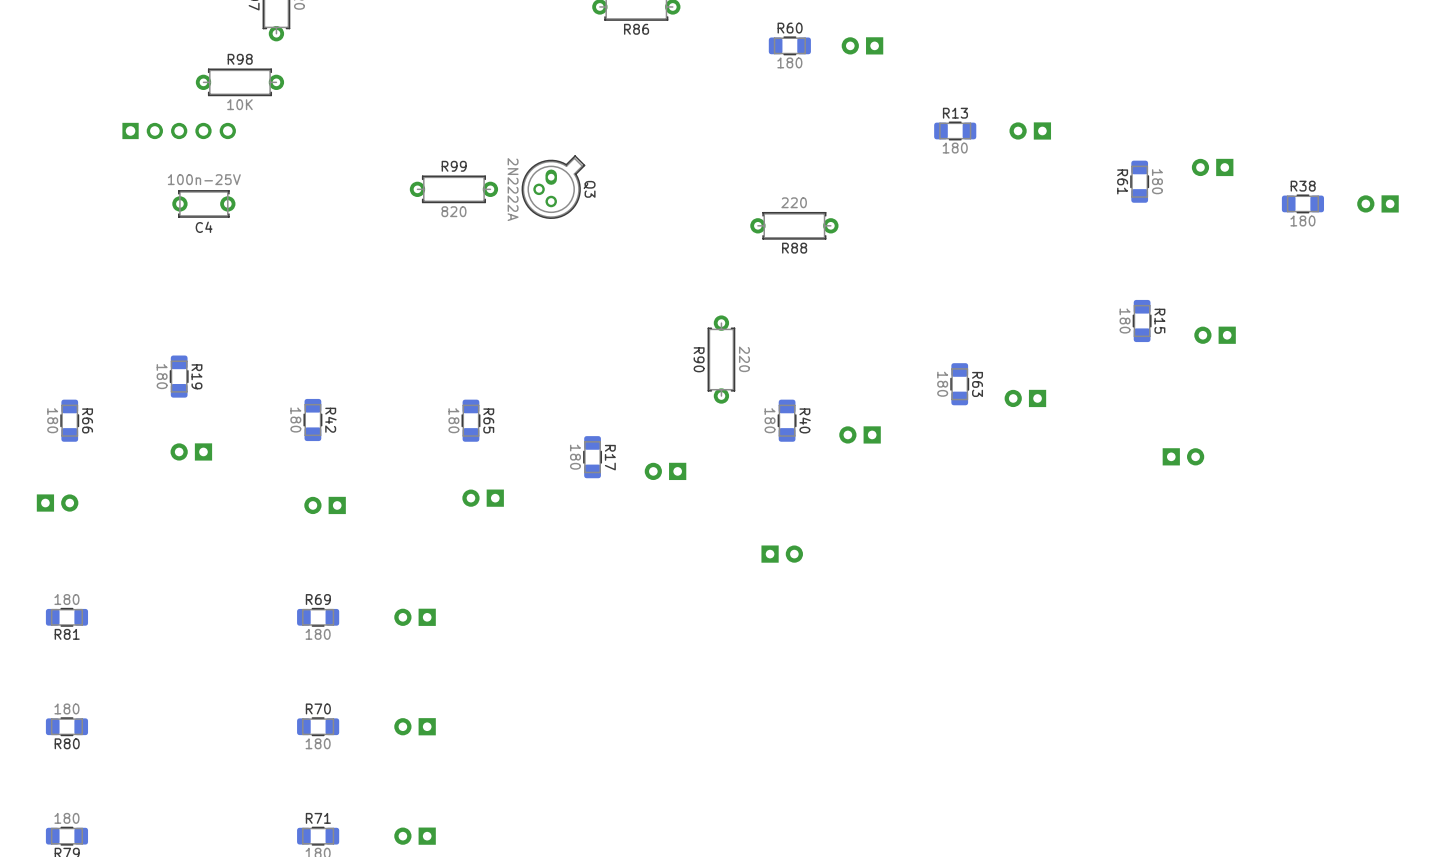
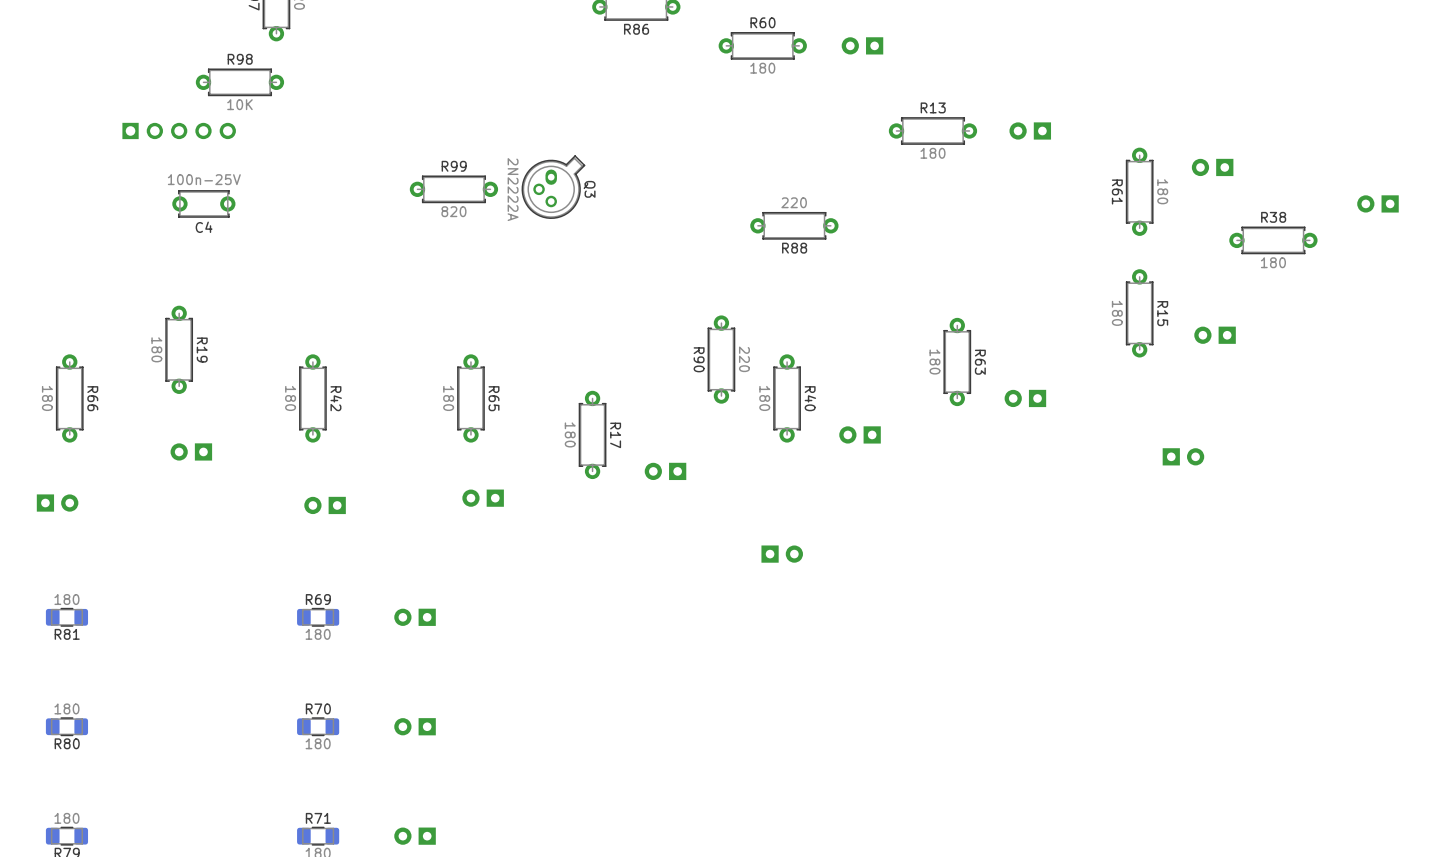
R60 footprint: [768, 36, 811, 56] -> [718, 32, 807, 60]
R13 footprint: [934, 121, 977, 141] -> [888, 117, 978, 145]
R61 footprint: [1130, 160, 1149, 203] -> [1125, 147, 1154, 236]
R38 footprint: [1281, 194, 1325, 214] -> [1229, 226, 1318, 255]
R15 footprint: [1132, 299, 1152, 343] -> [1125, 269, 1154, 358]
R19 footprint: [169, 355, 189, 398] -> [165, 305, 193, 394]
R63 footprint: [950, 363, 970, 406] -> [943, 317, 971, 407]
R42 footprint: [303, 398, 323, 442] -> [299, 354, 327, 443]
R66 footprint: [60, 399, 80, 442] -> [56, 354, 84, 443]
R65 footprint: [461, 399, 481, 442] -> [457, 354, 485, 443]
R40 footprint: [777, 399, 797, 442] -> [773, 354, 801, 443]
R17 footprint: [583, 436, 602, 479] -> [578, 390, 607, 480]

